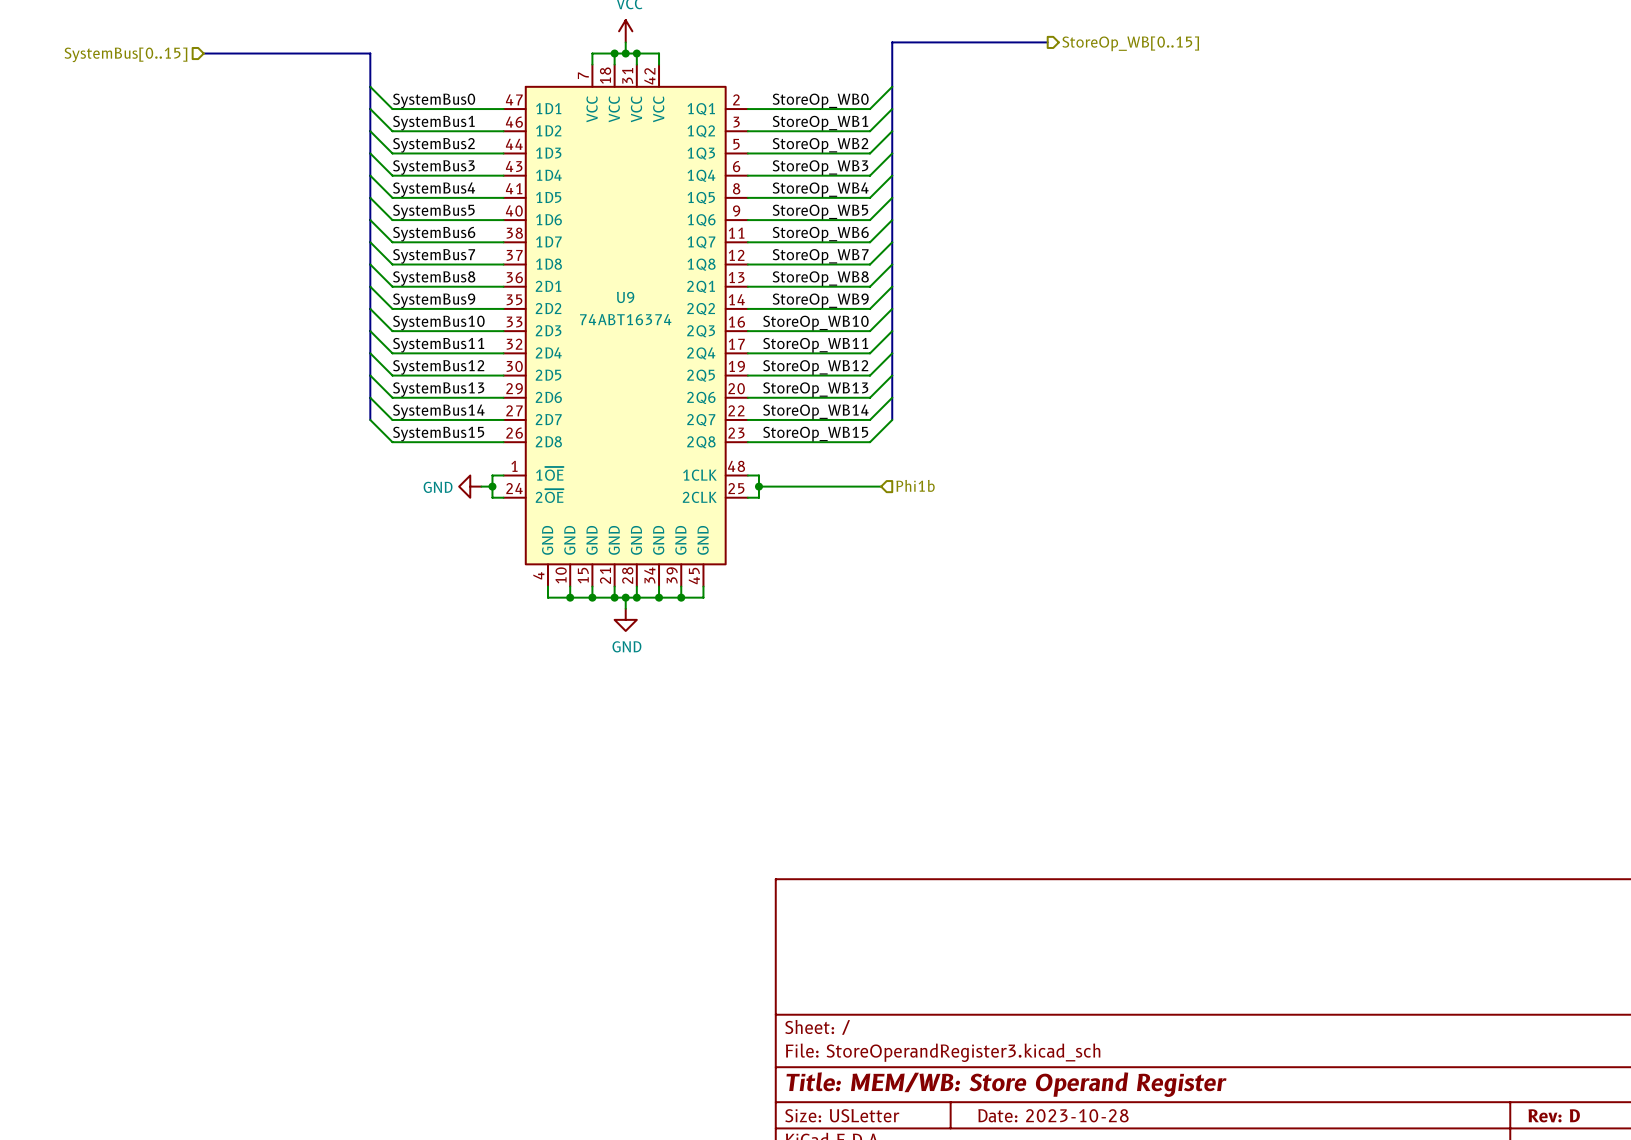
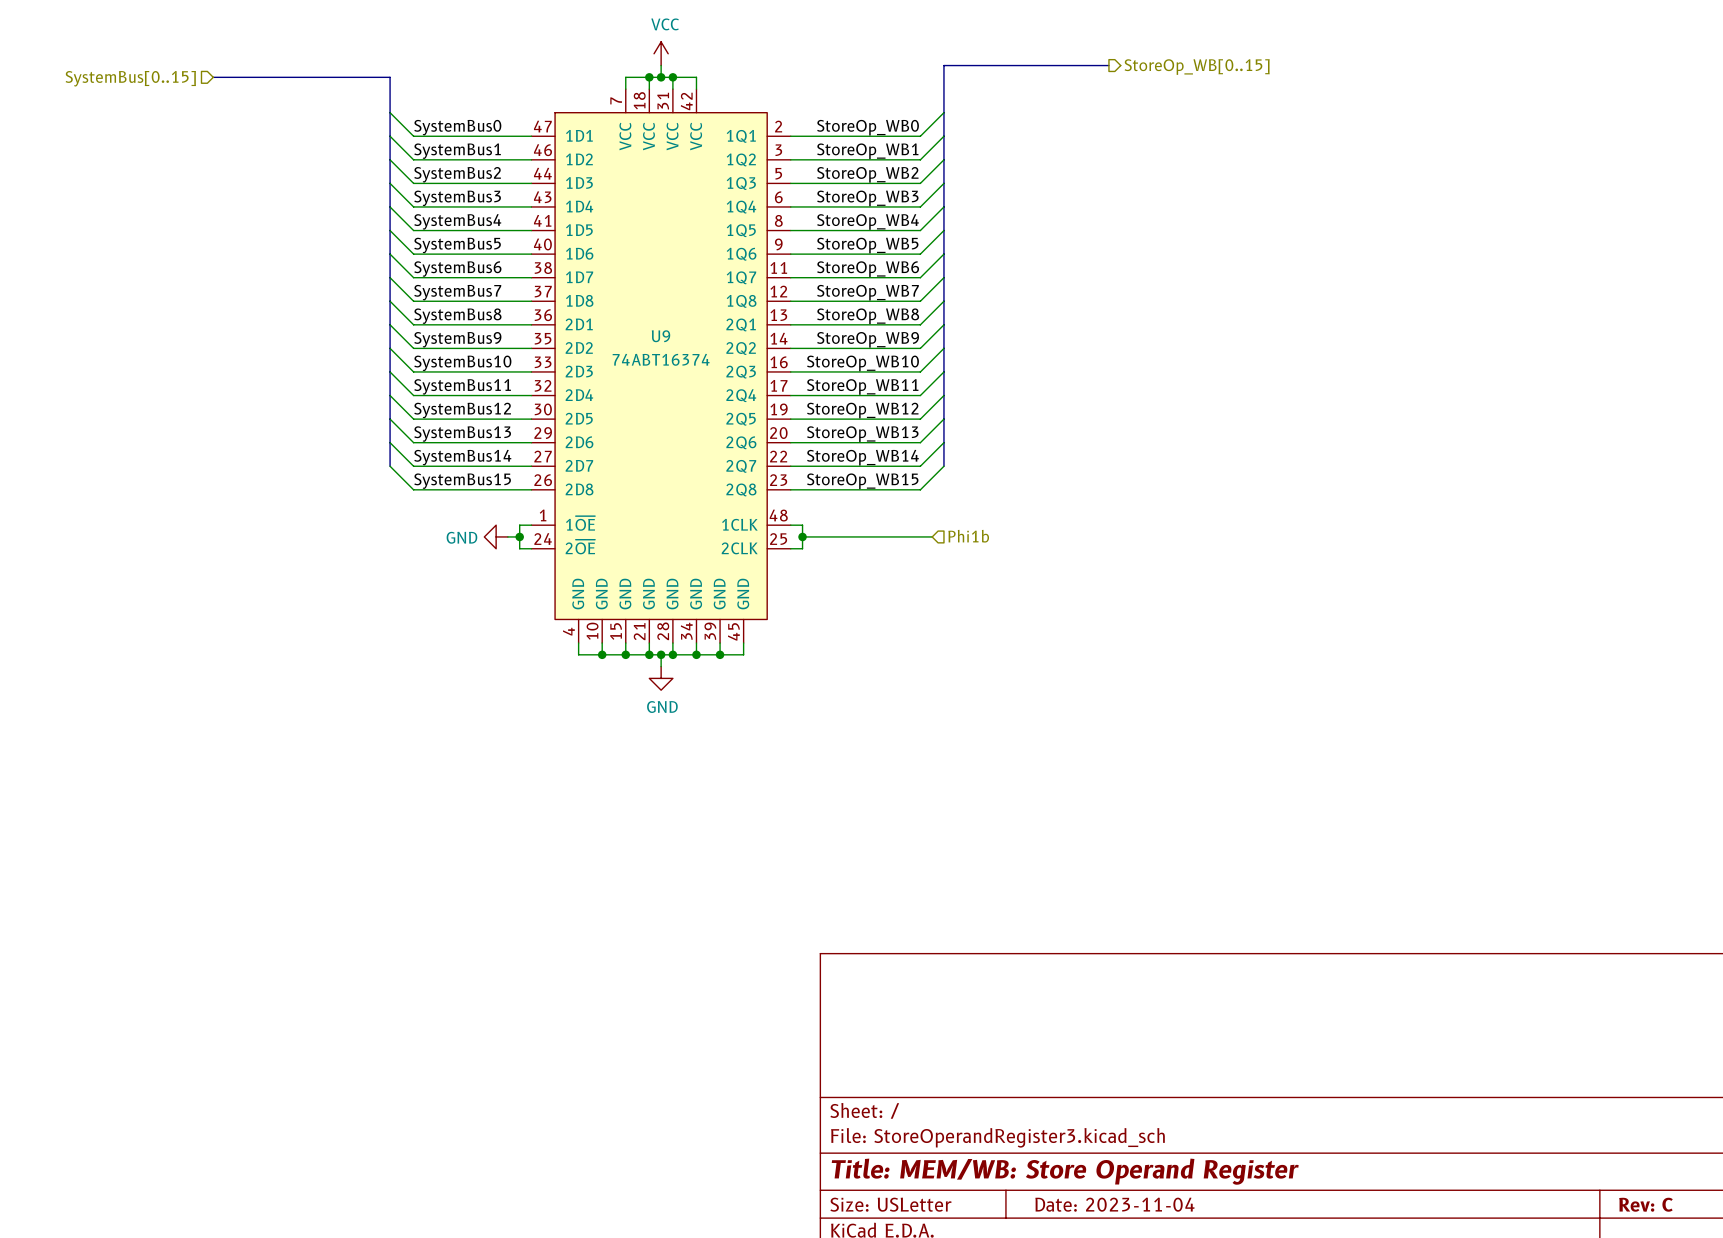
title block: Date: 2023-10-28 (1053, 1115) -> Date: 2023-11-04 (1114, 1204)
title block: Rev: D (1554, 1115) -> Rev: C (1645, 1204)

